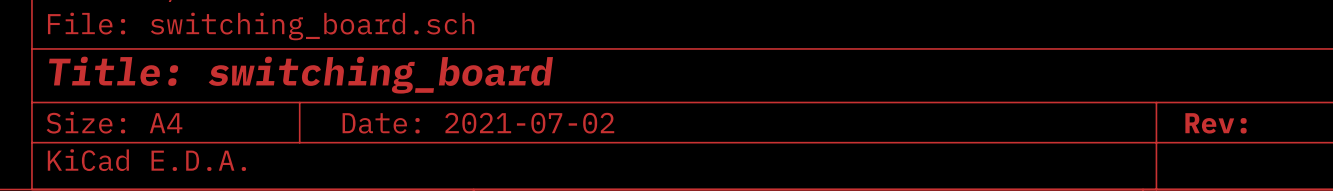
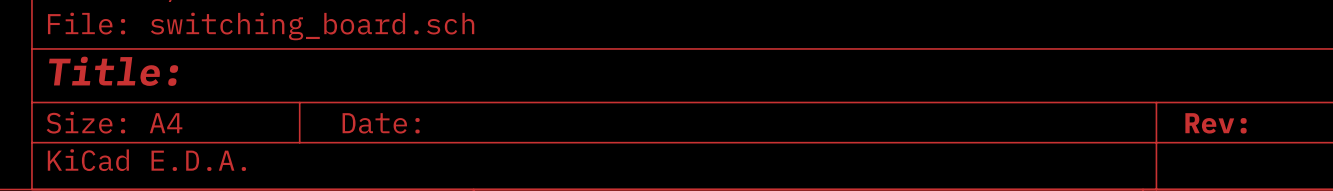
title block: Title: switching_board (301, 75) -> Title: (113, 71)
title block: Date: 2021-07-02 (478, 123) -> Date: (381, 123)

